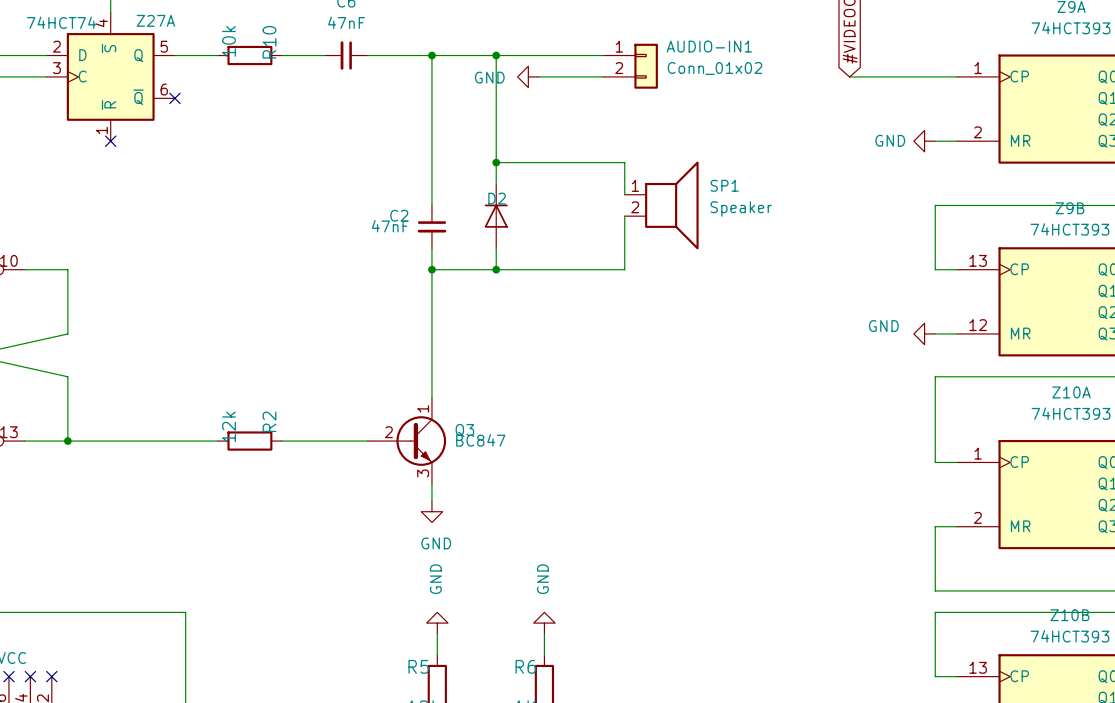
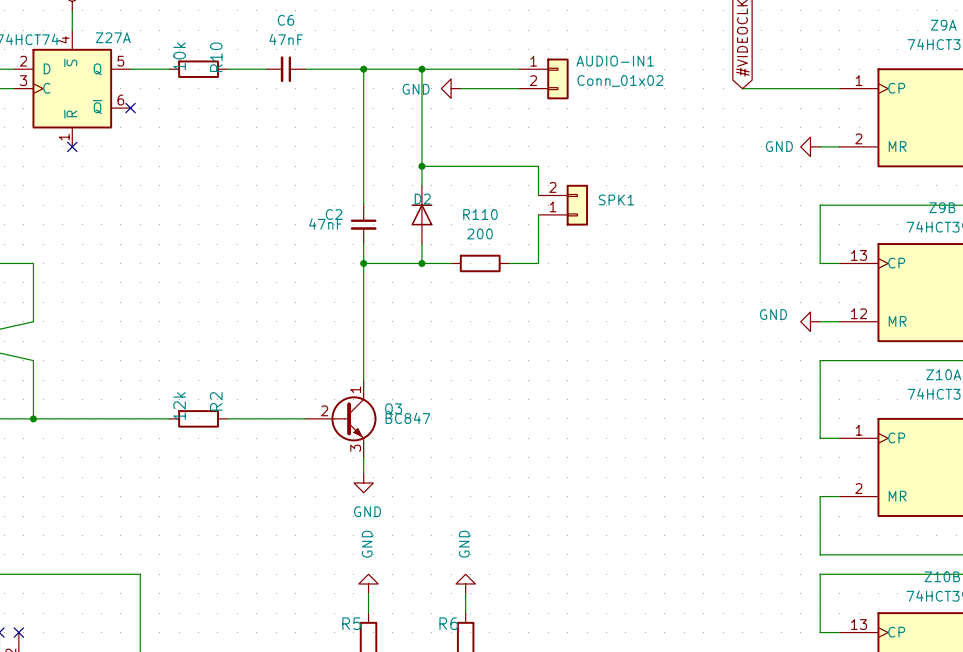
SPK1: none -> (563, 205)
SP1: Speaker (661, 205) -> none
wire: (528, 269) (592, 269) -> none
R110: none -> 200 (480, 263)

